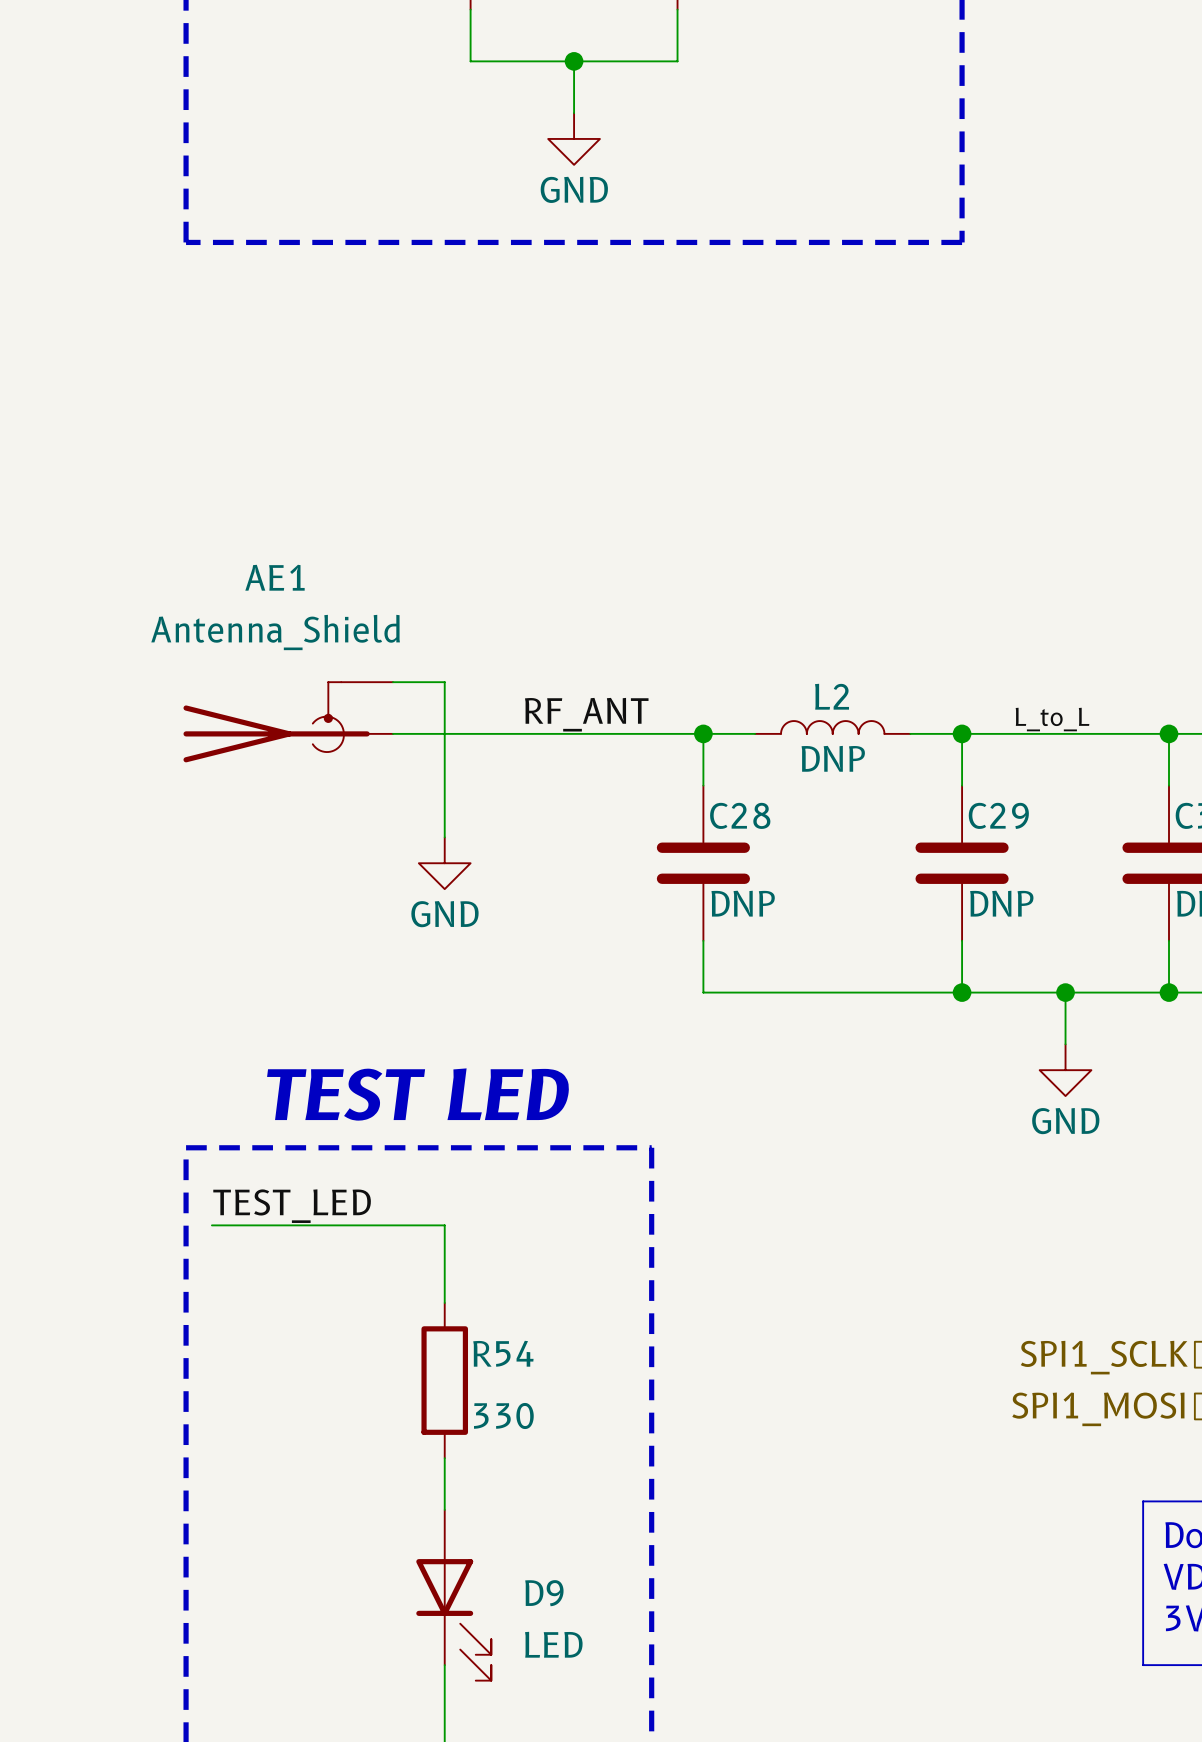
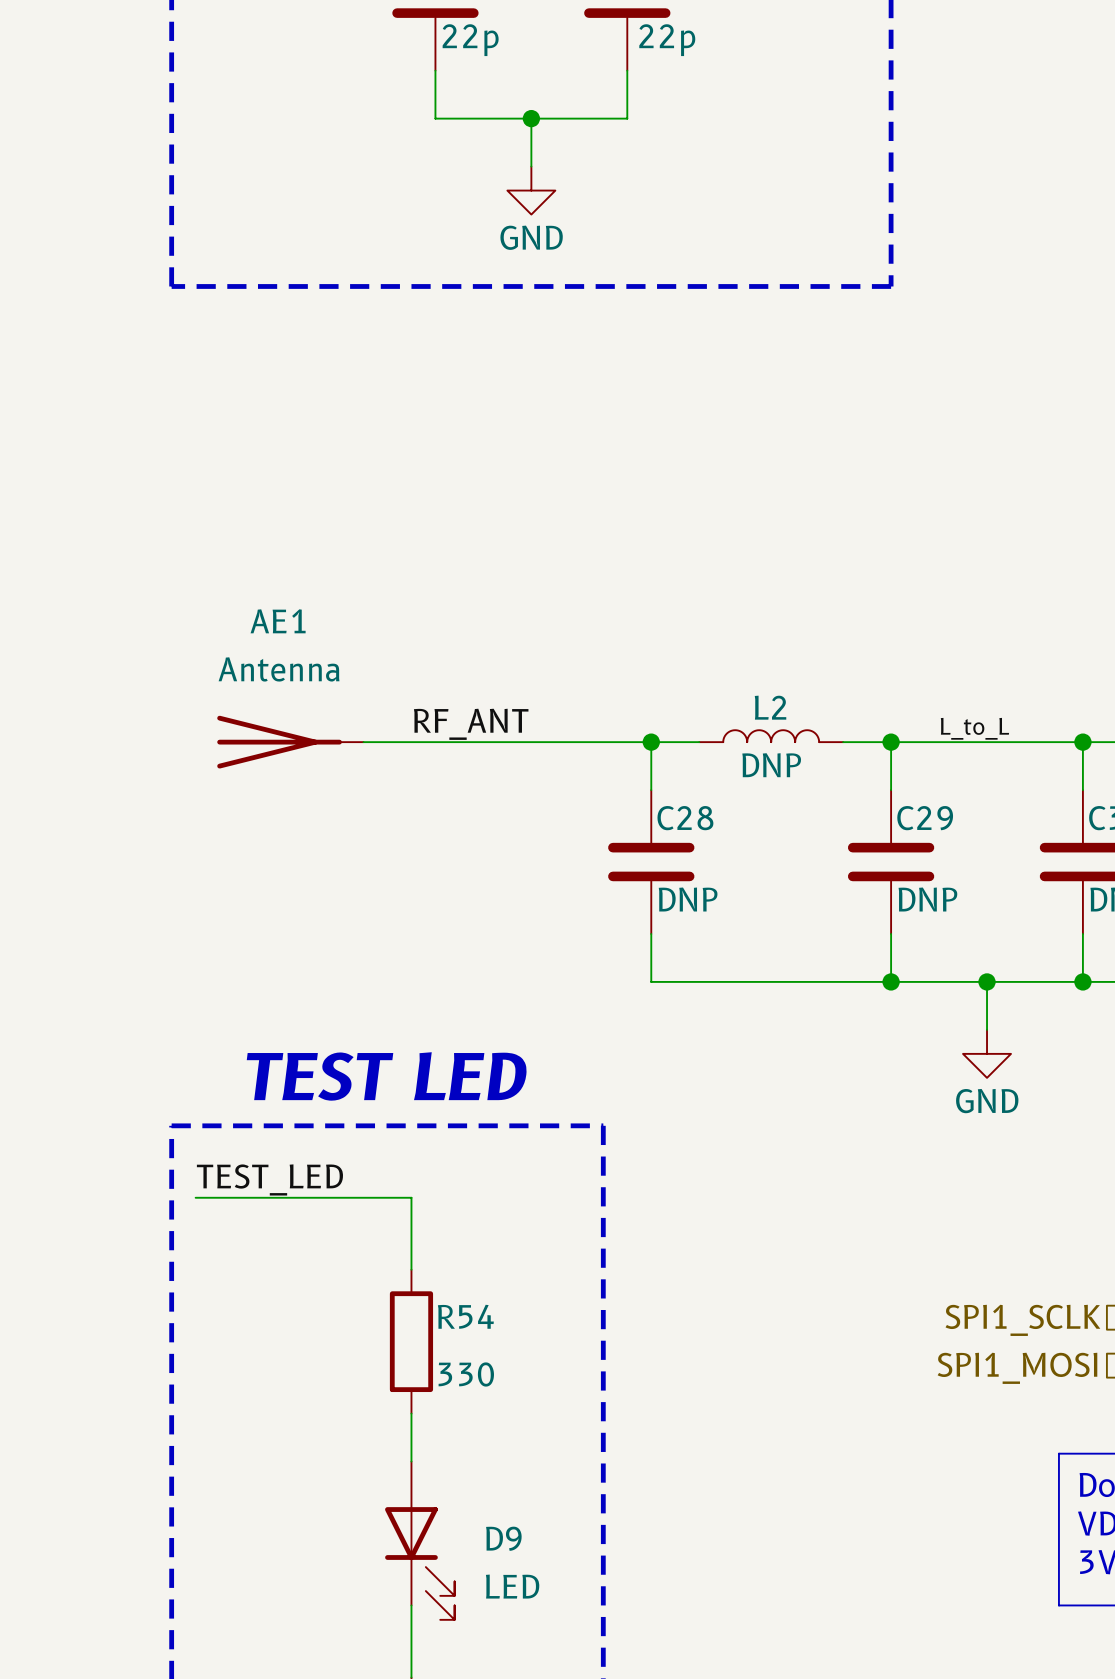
AE1 value: Antenna_Shield (275, 632) -> Antenna (279, 669)
AE1 symbol: [183, 682, 393, 763] -> [217, 715, 364, 769]
wire: (392, 682) (444, 682) (444, 837) -> none
label position: RF_ANT (586, 714) -> RF_ANT (471, 724)
power symbol: GND (444, 863) -> none

